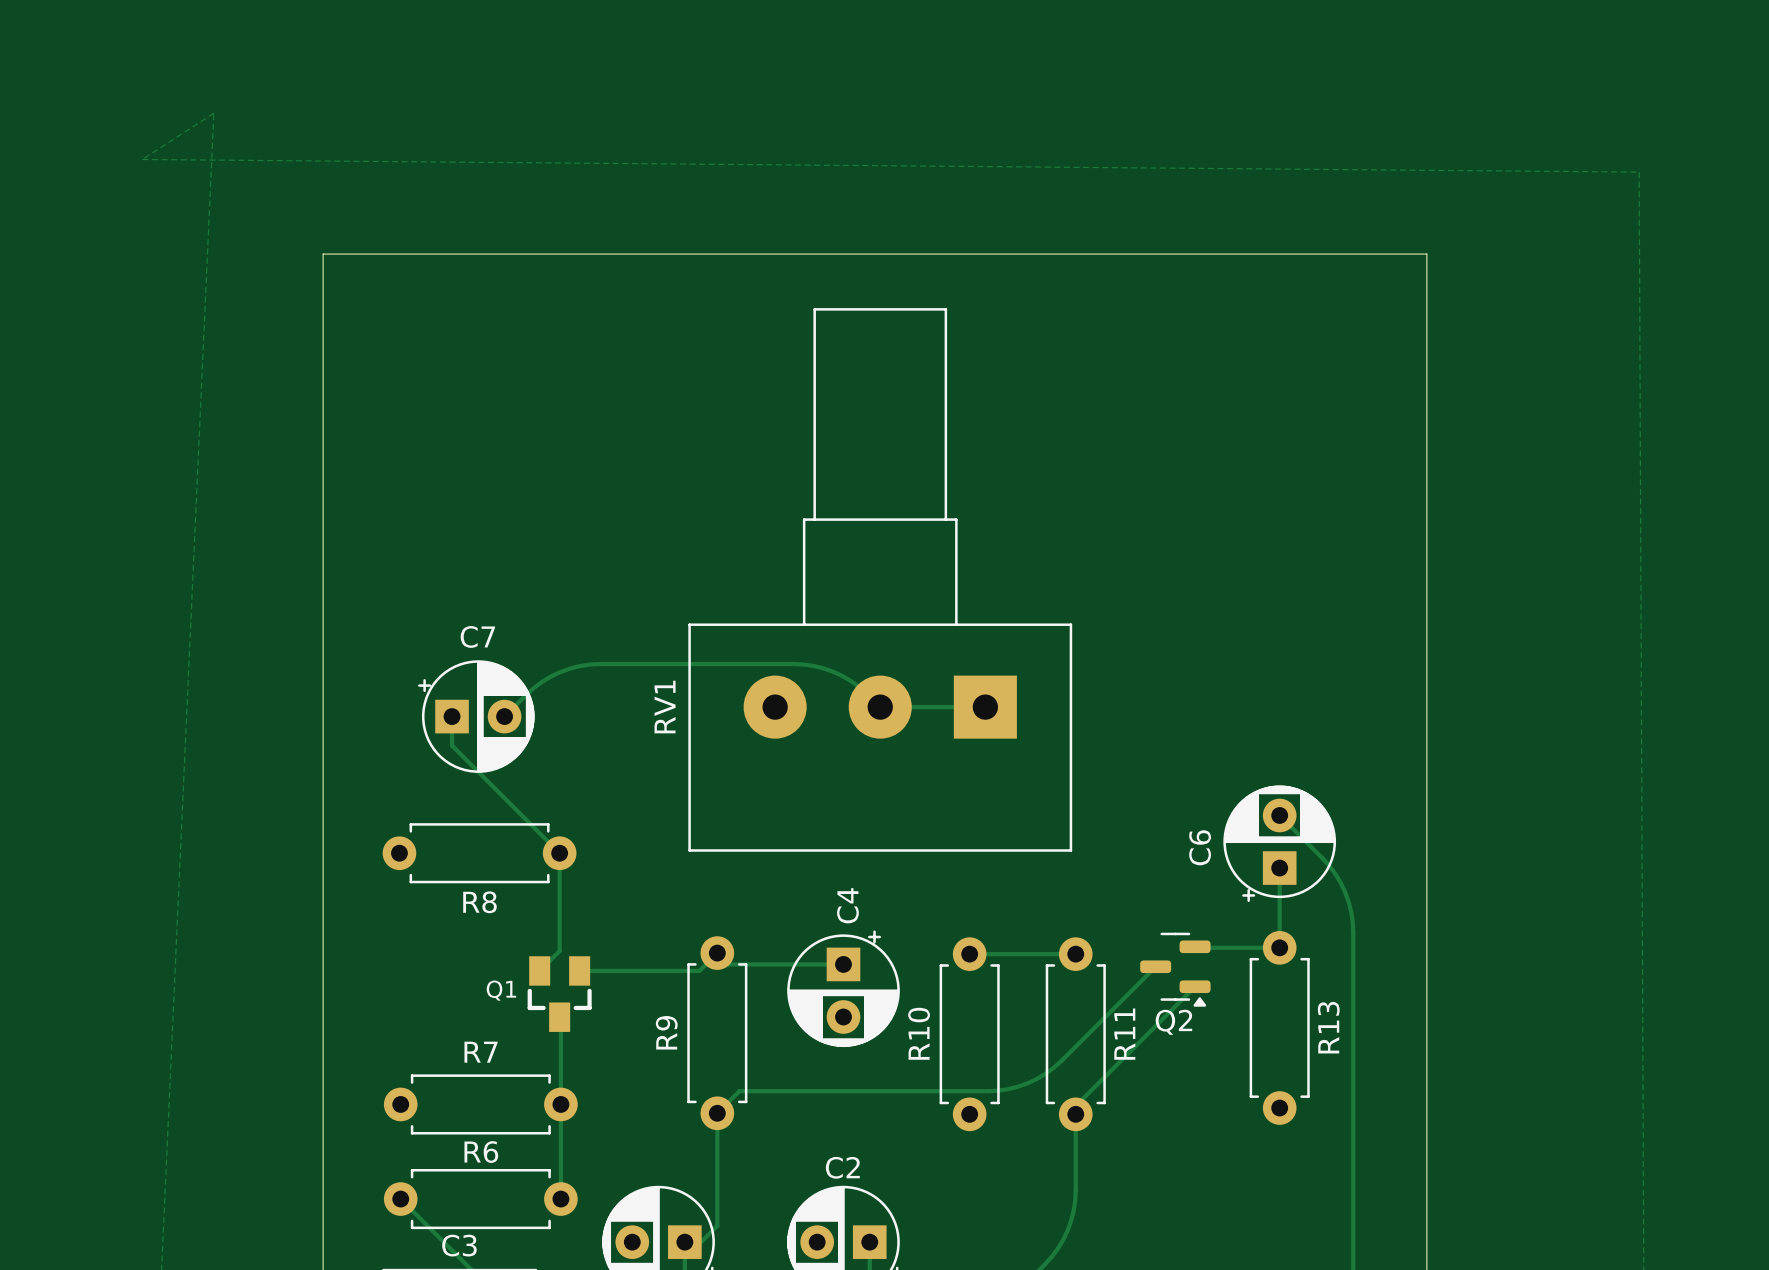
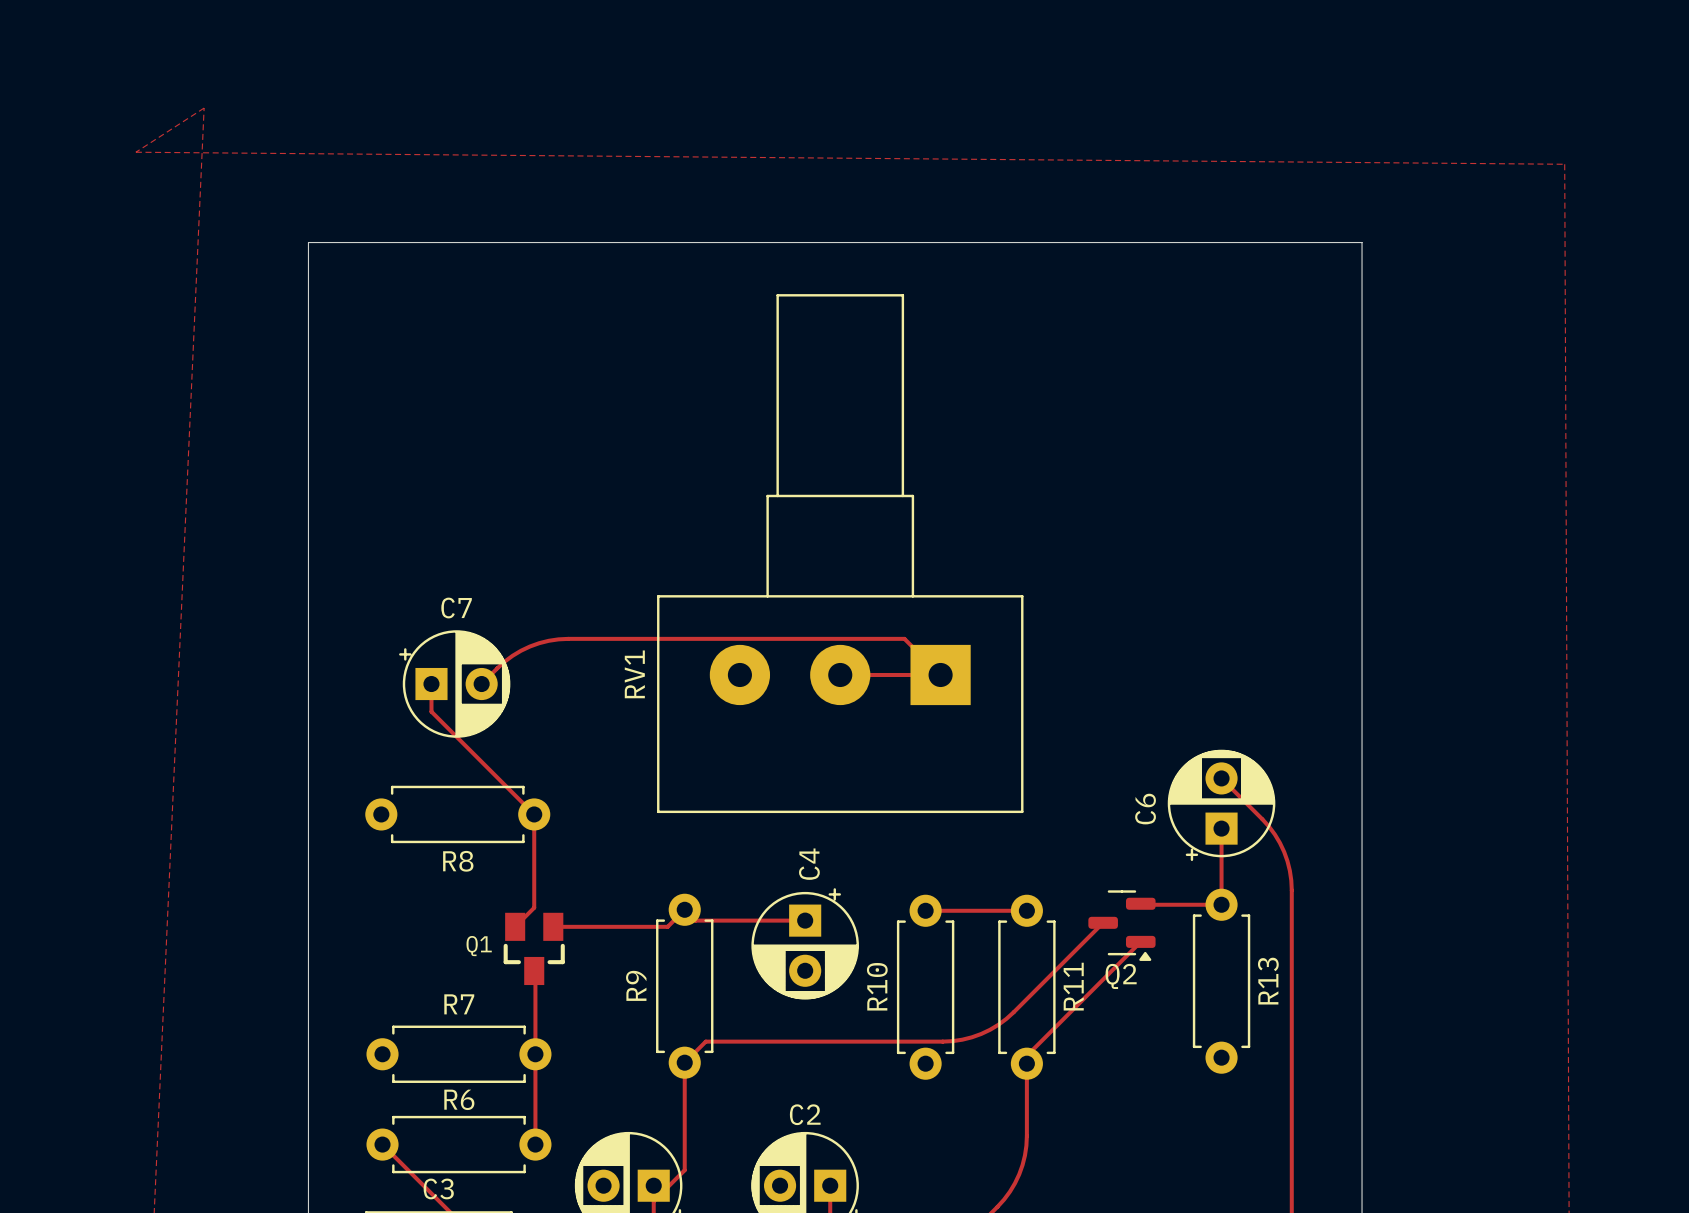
track: (521, 700) (533, 687) (551, 676) (570, 668) (590, 664) (793, 664) (814, 666) (843, 676) (860, 687) (880, 707) -> (497, 668) (521, 650) (539, 643) (558, 639) (904, 638) (940, 674)

